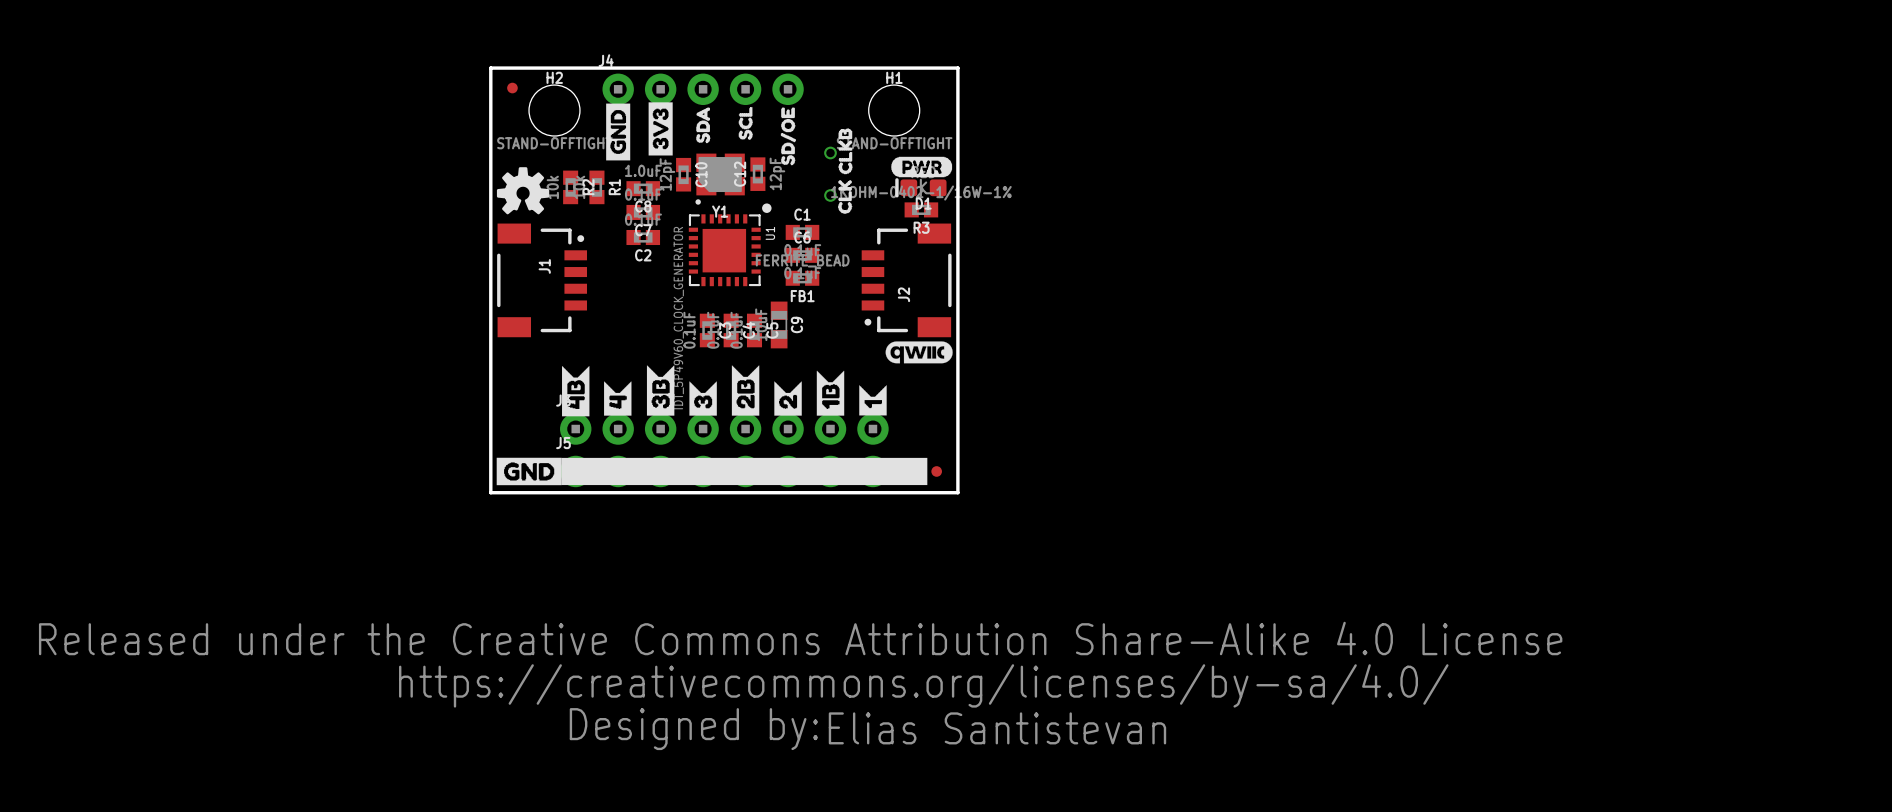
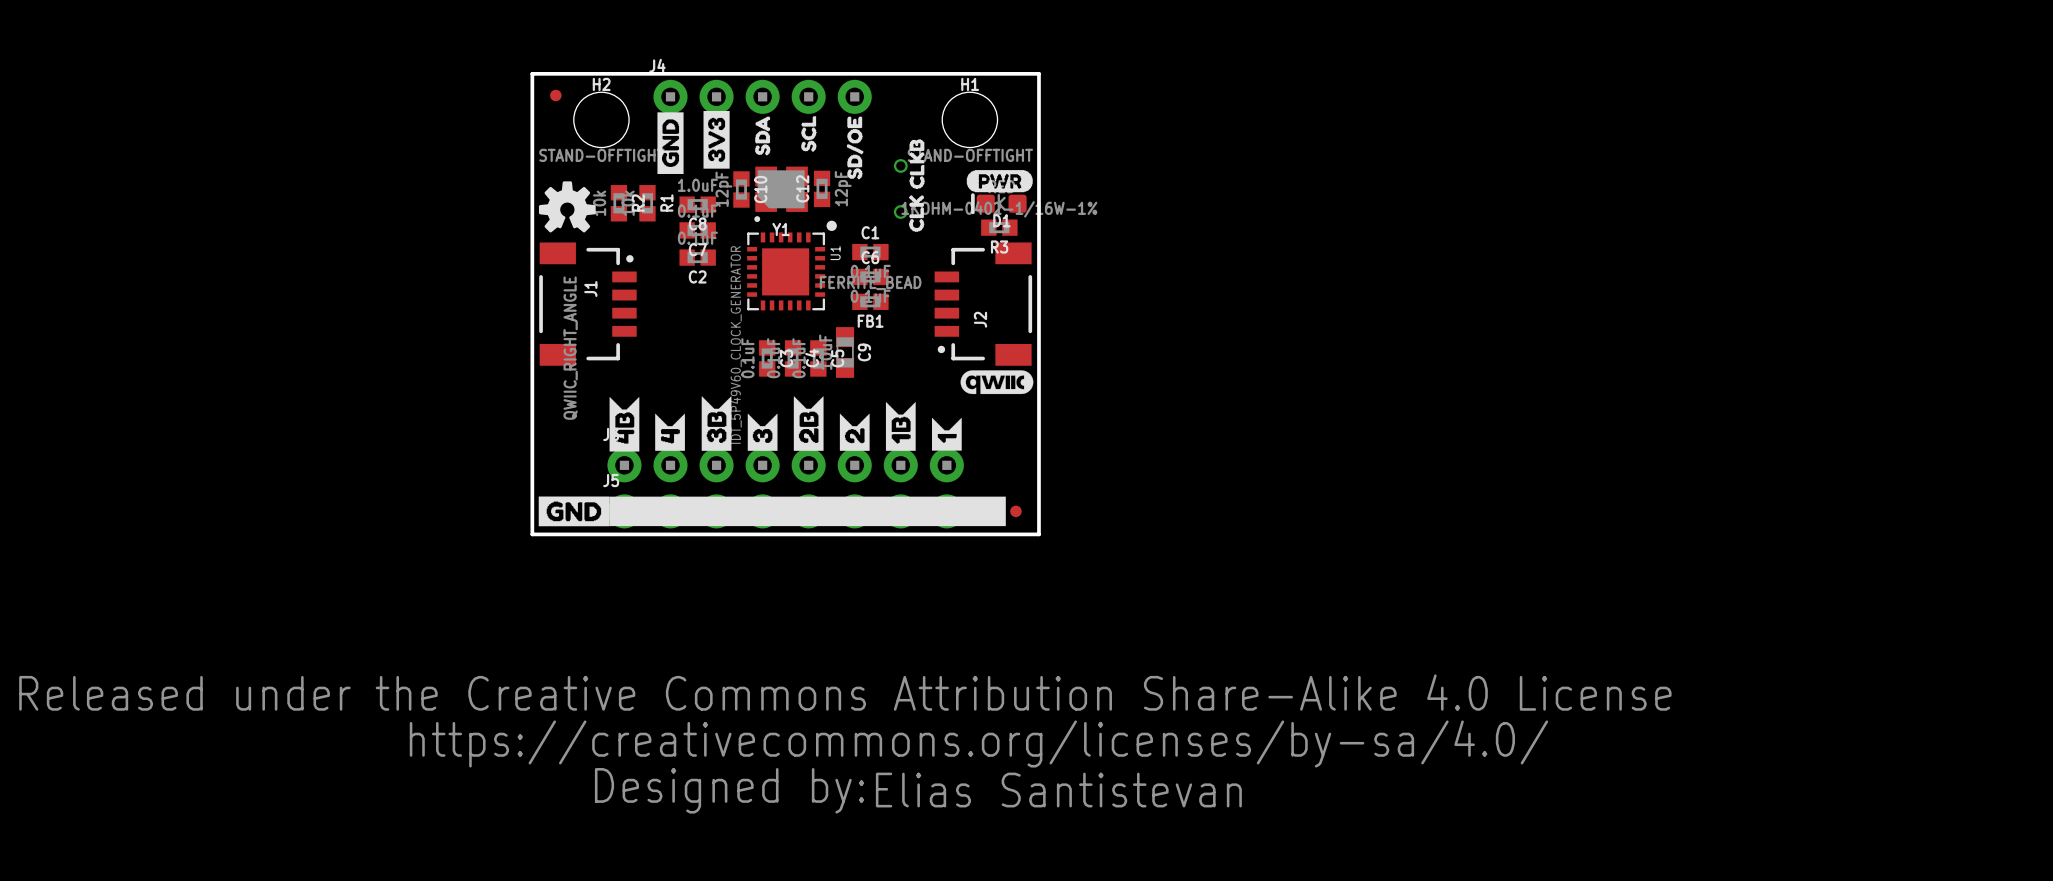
J1 value: none -> QWIIC_RIGHT_ANGLE (570, 348)
drawing position: (800, 685) -> (845, 743)
text position: Elias Santistevan (997, 728) -> Elias Santistevan (1058, 790)

